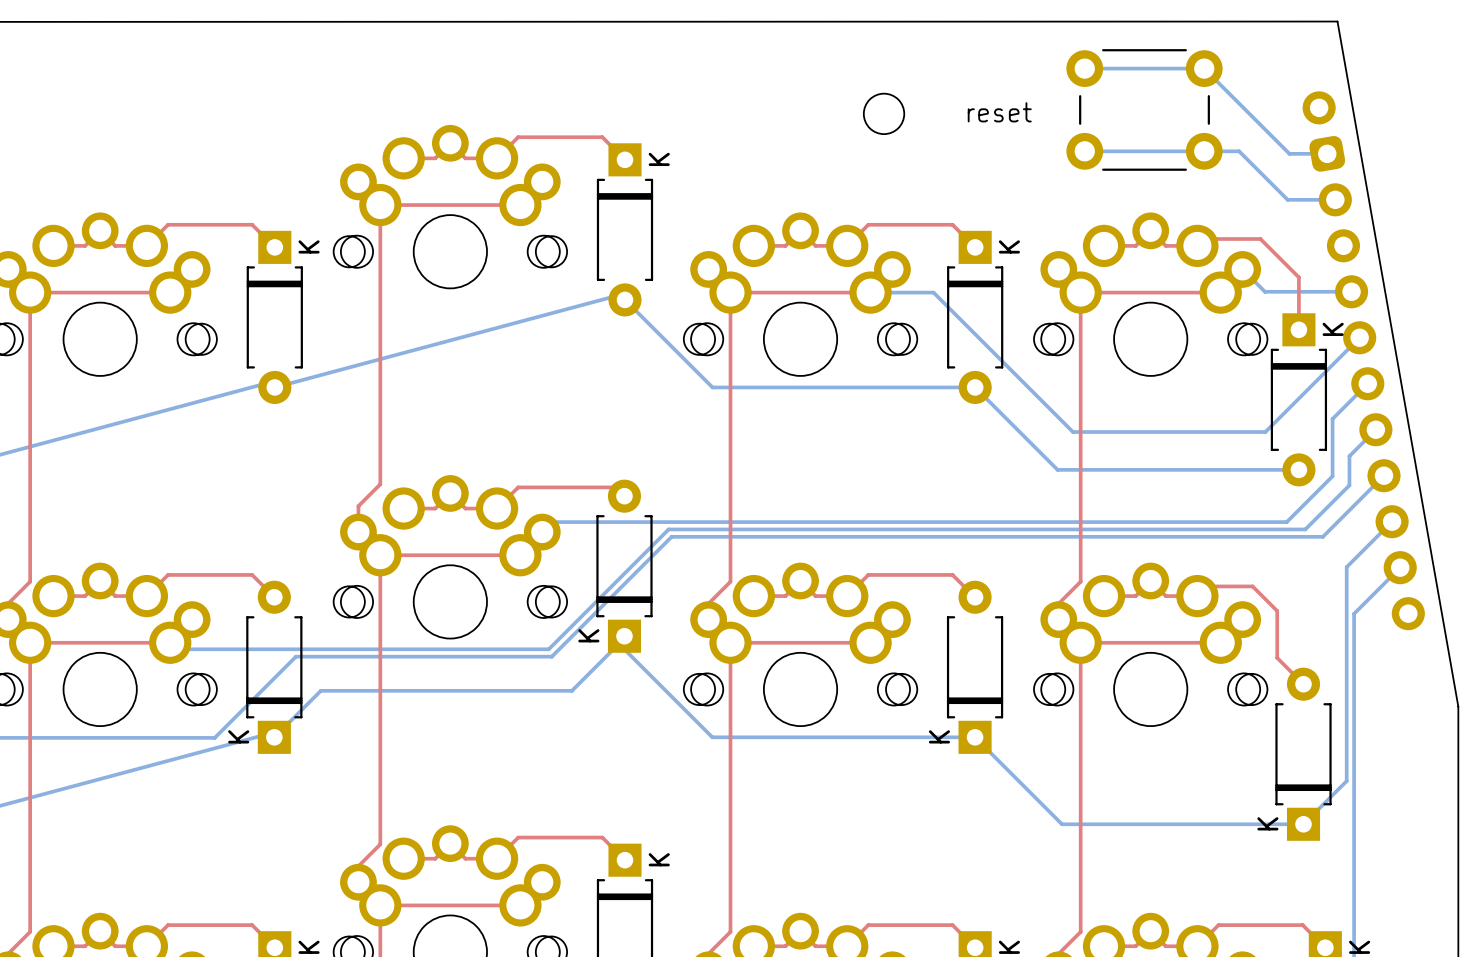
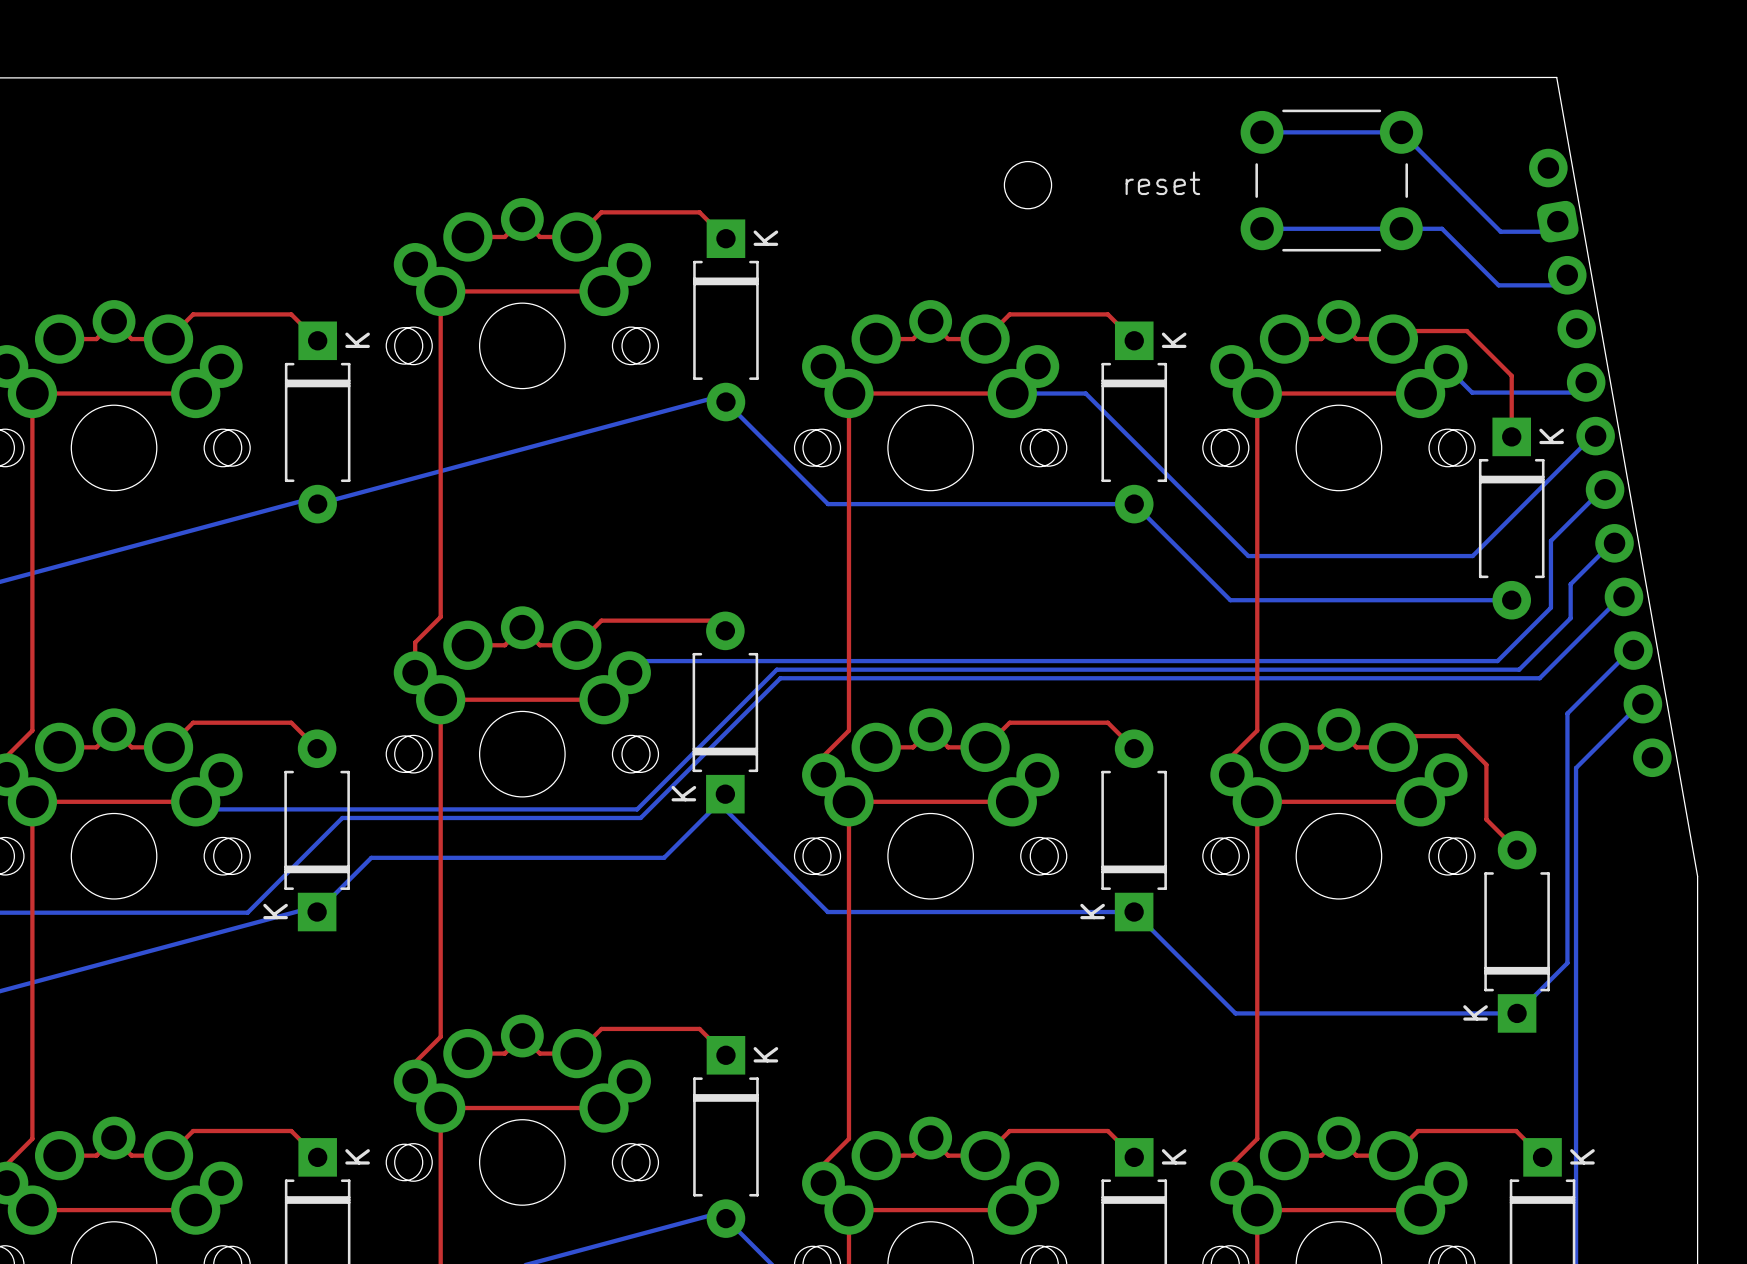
part position: (1363, 360) -> (1600, 462)

